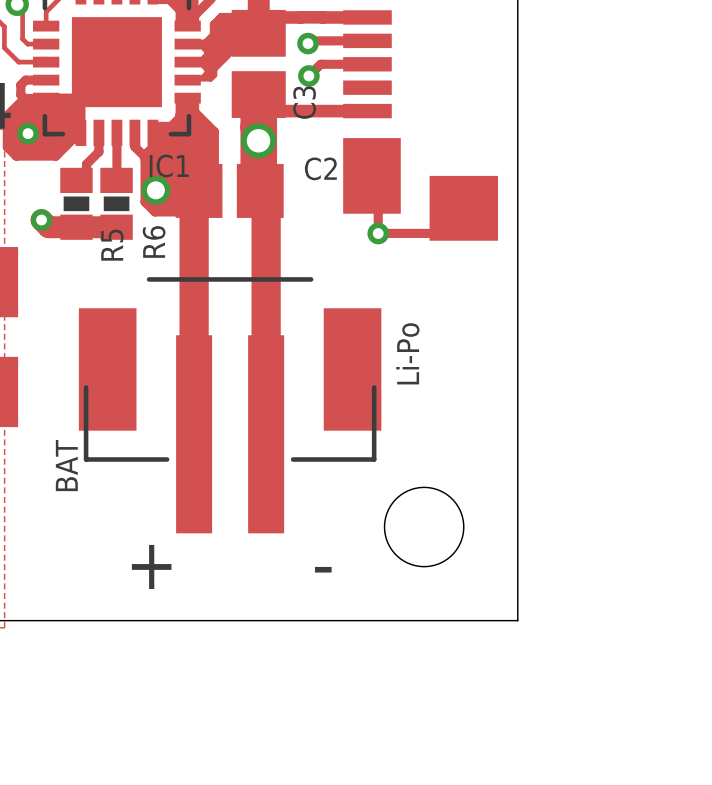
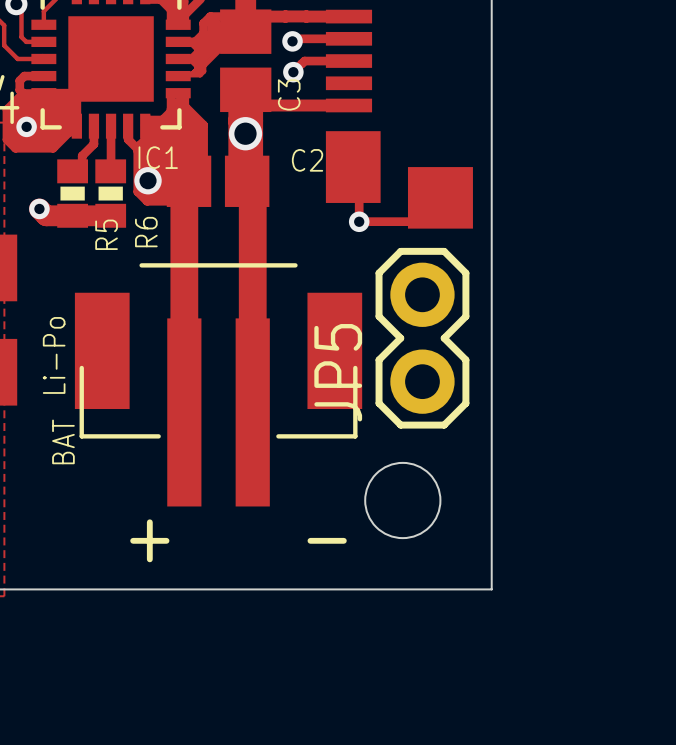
text position: Li-Po (407, 353) -> Li-Po (54, 355)
JP5: none -> (422, 338)

